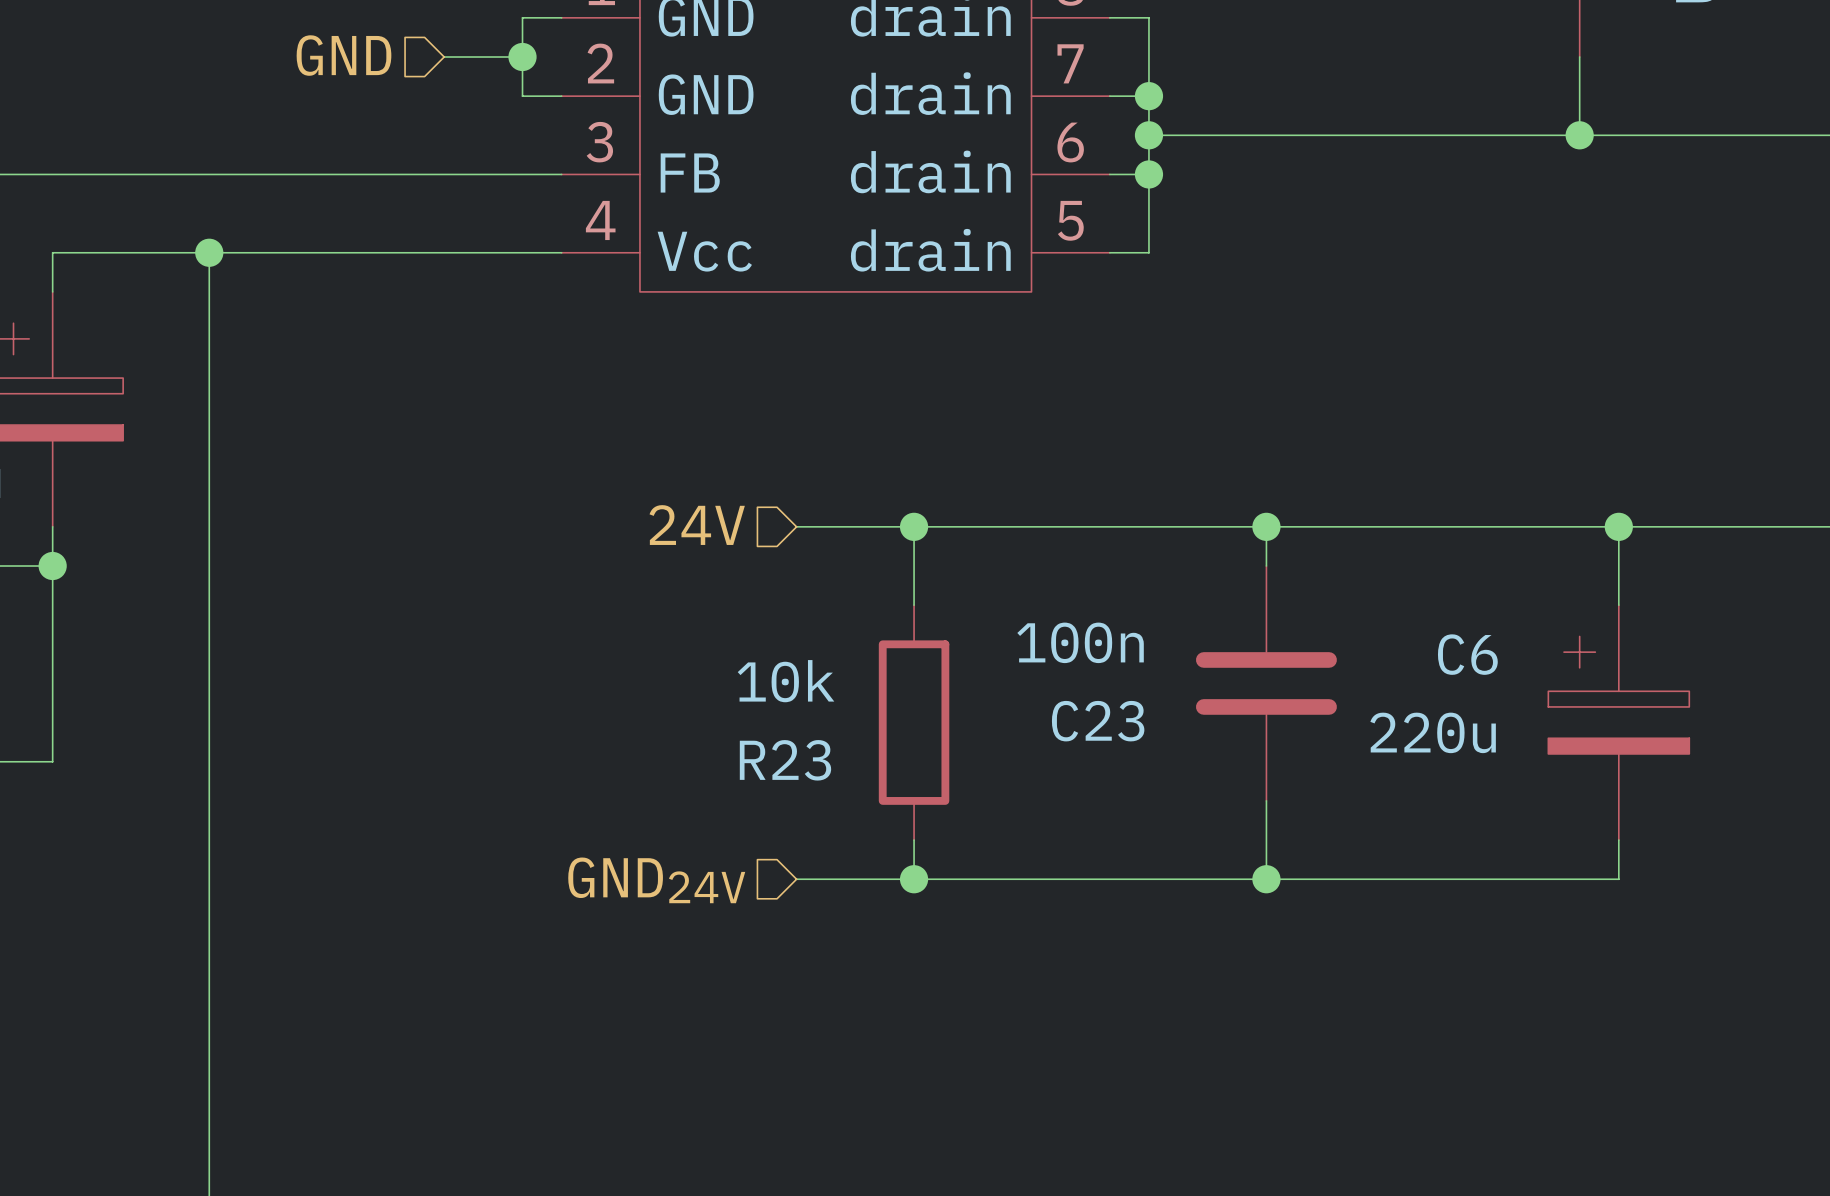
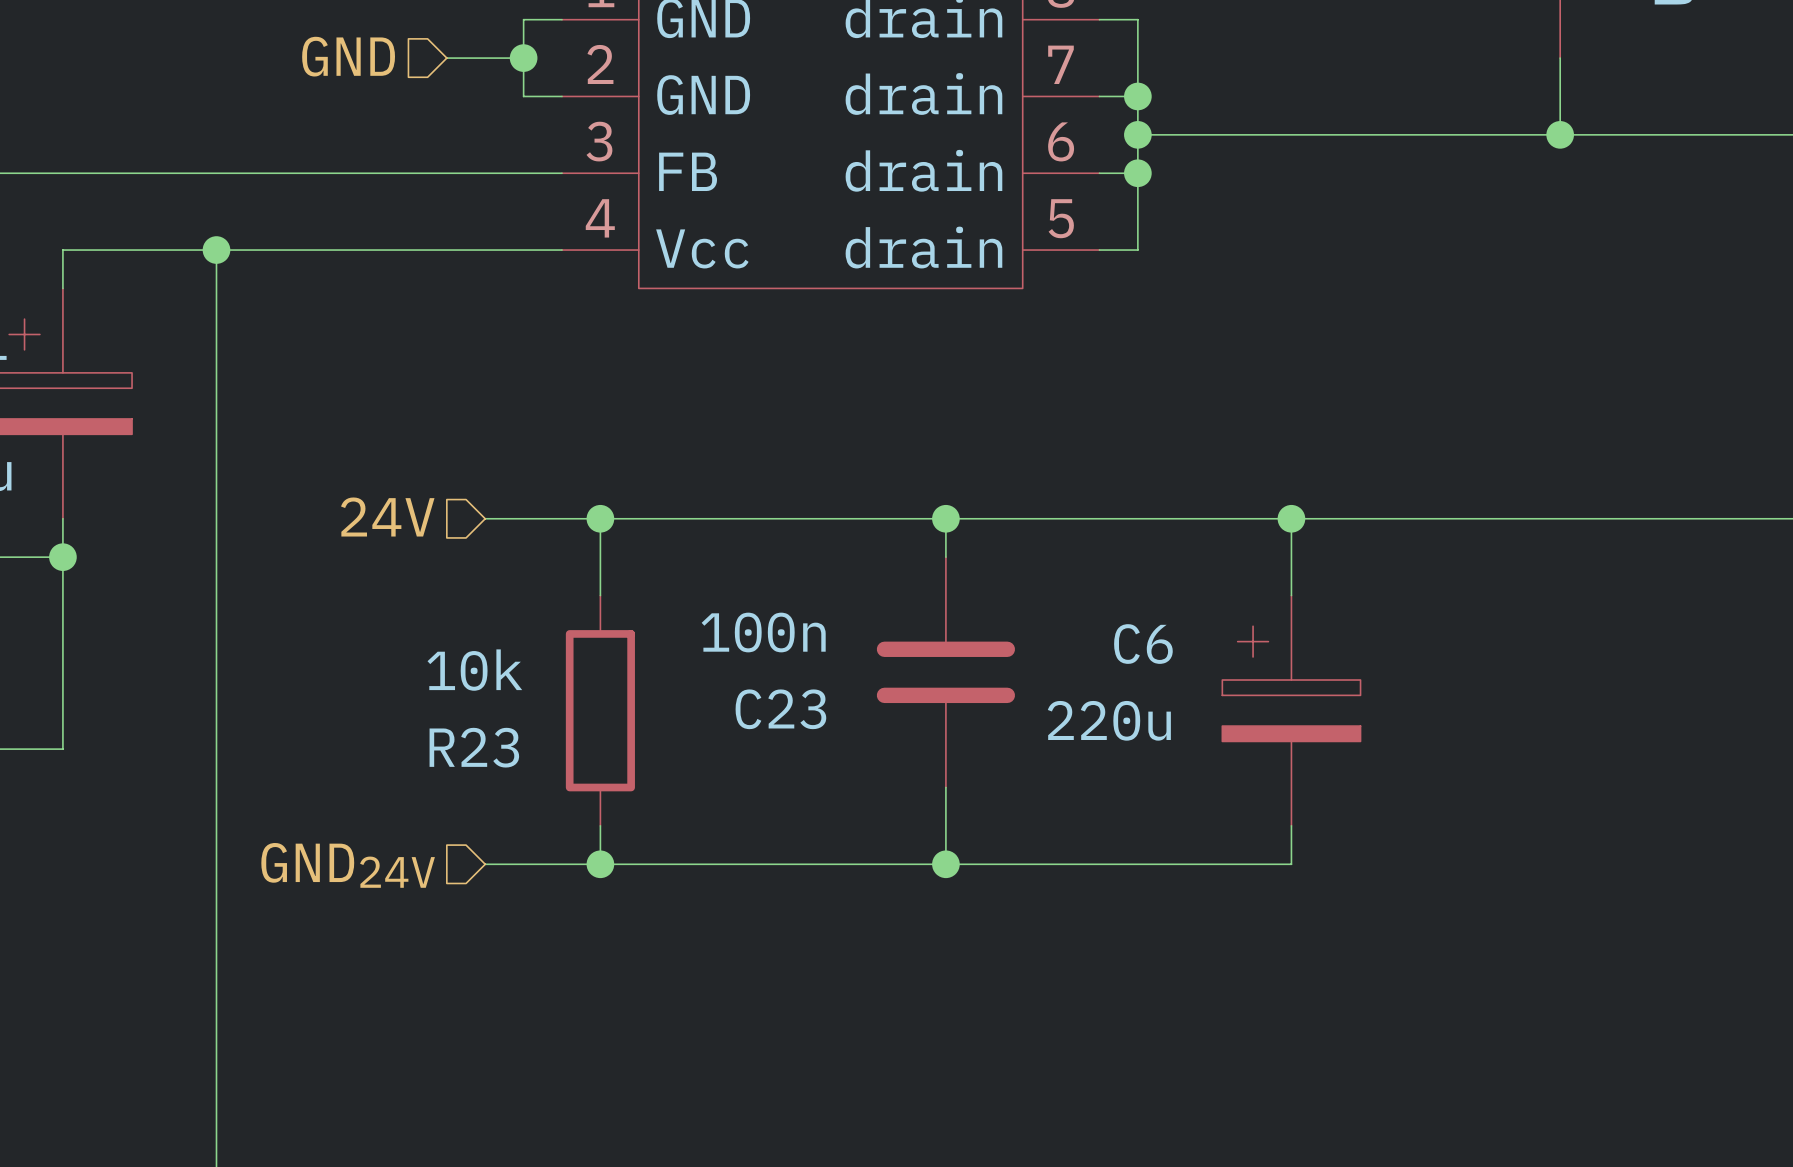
hierarchical label position: 24V (697, 525) -> 24V (387, 517)
wire: none -> (485, 518) (792, 518)
junction: none -> (600, 518)
wire: (914, 526) (914, 605) -> (600, 518) (600, 595)
junction position: (914, 526) -> (945, 518)
wire: (1266, 526) (1266, 566) -> (945, 518) (945, 557)
junction position: (1266, 526) -> (1291, 518)
wire: (1618, 526) (1618, 605) -> (1291, 518) (1291, 595)
junction: (1618, 526) -> none
C23 position: (1266, 683) -> (945, 672)
R23 position: (914, 722) -> (600, 710)
C6 position: (1618, 722) -> (1291, 710)
wire: (1266, 800) (1266, 879) -> (945, 787) (945, 864)
wire: (914, 840) (914, 879) -> (600, 825) (600, 864)
wire: (1618, 840) (1618, 879) (1305, 879) -> (1291, 825) (1291, 864)
wire: none -> (485, 864) (792, 864)
junction: none -> (600, 864)
junction position: (914, 879) -> (945, 864)
junction: (1266, 879) -> none
hierarchical label position: GND24V (656, 880) -> GND24V (348, 865)

